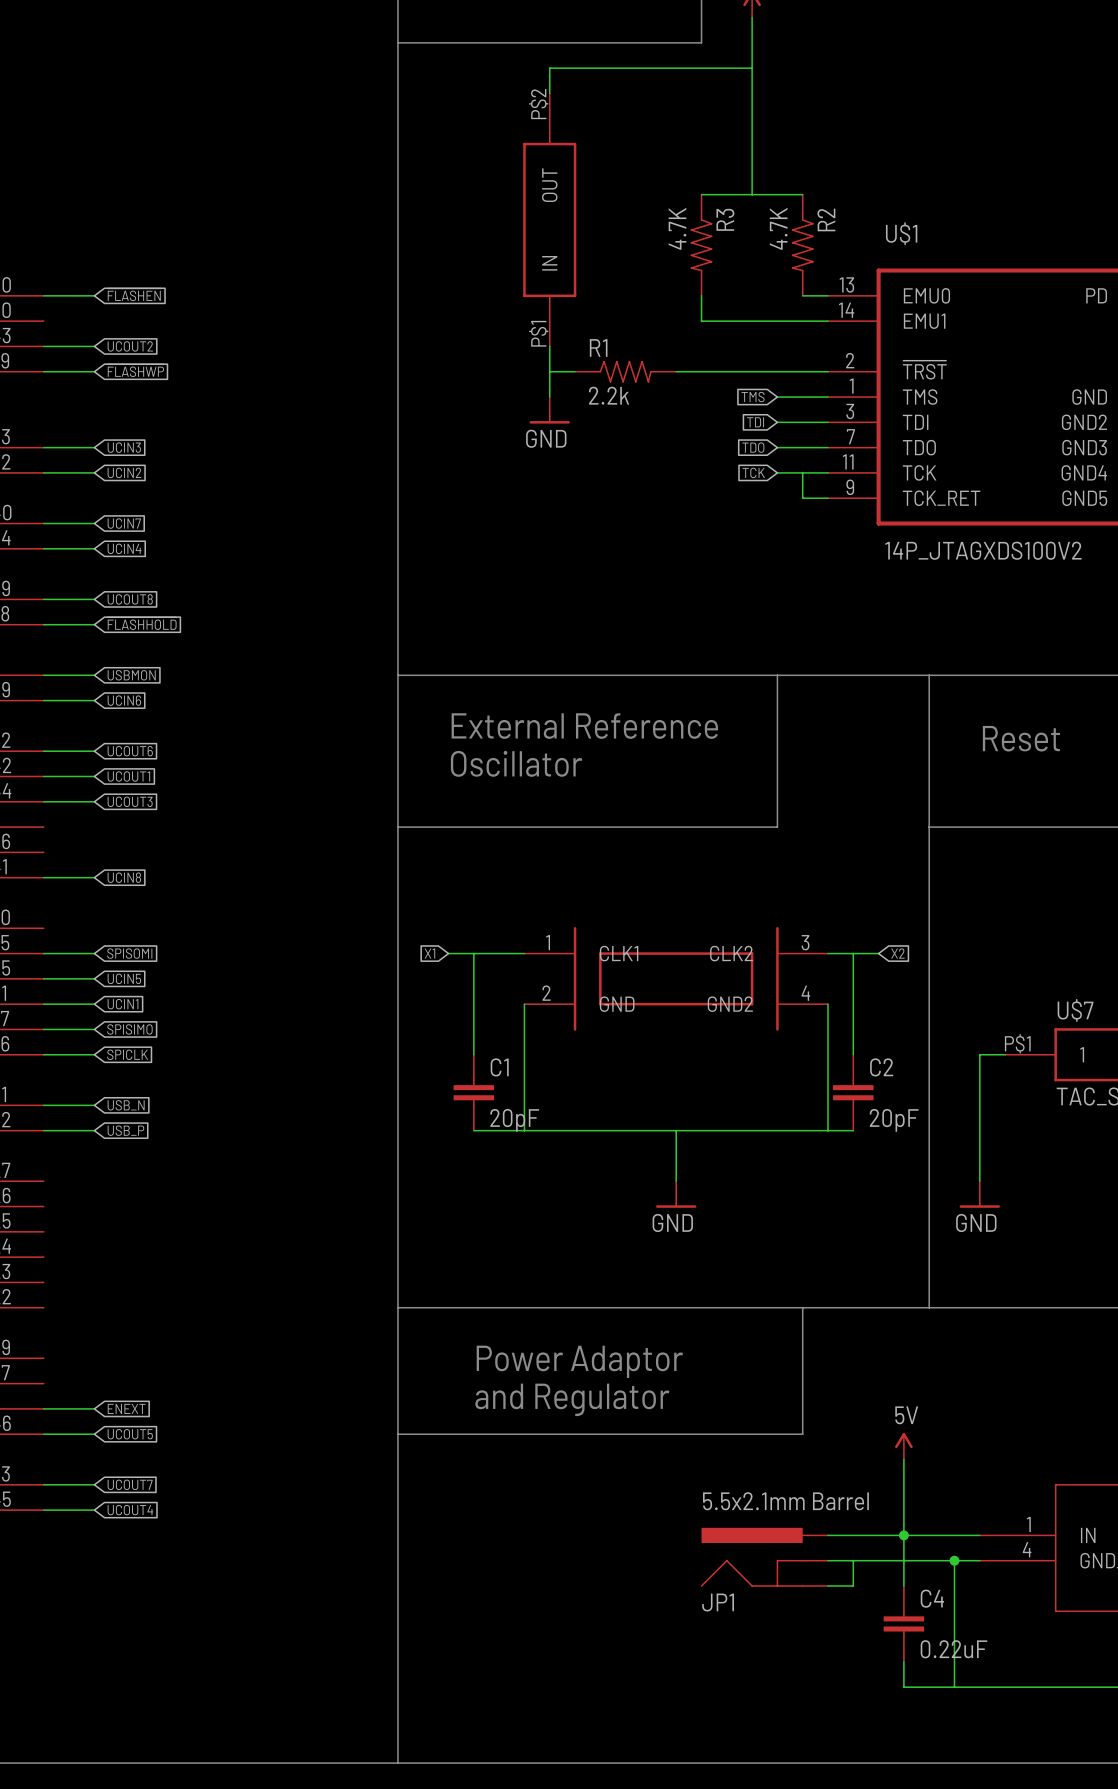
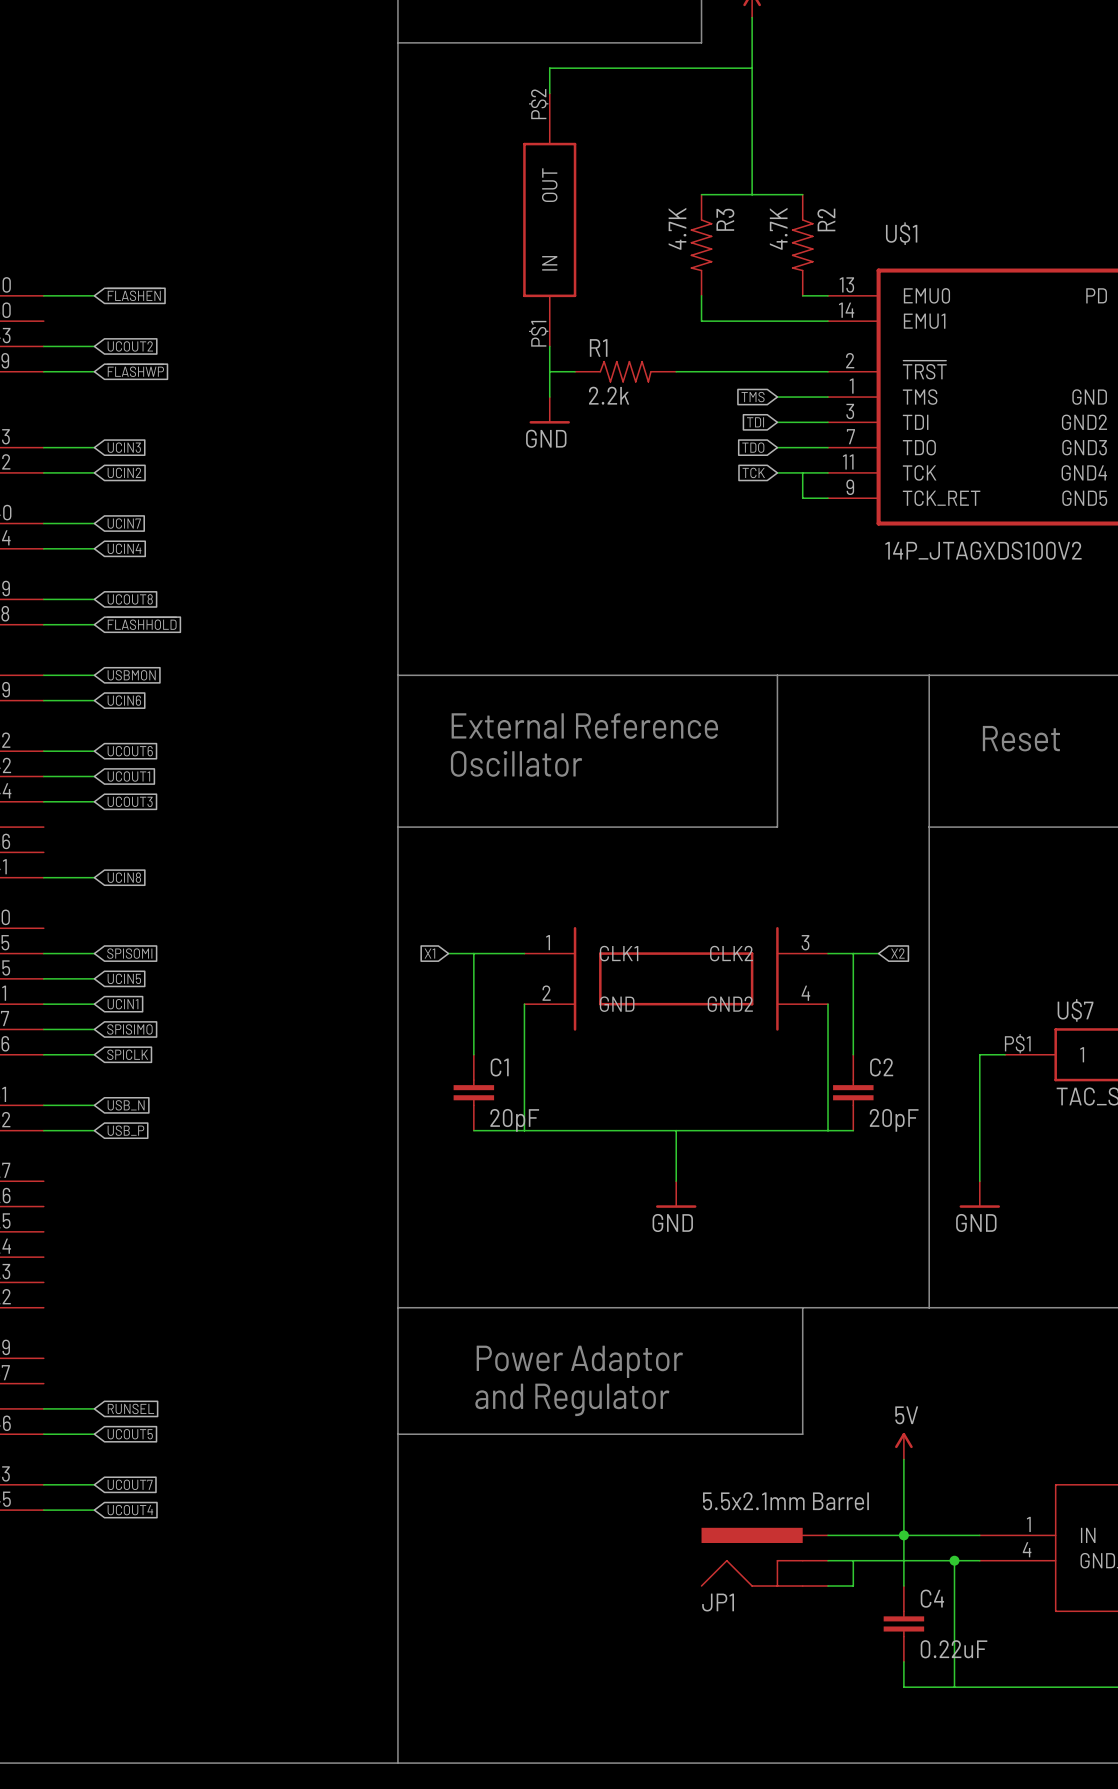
global label: ENEXT (126, 1408) -> RUNSEL (130, 1408)

